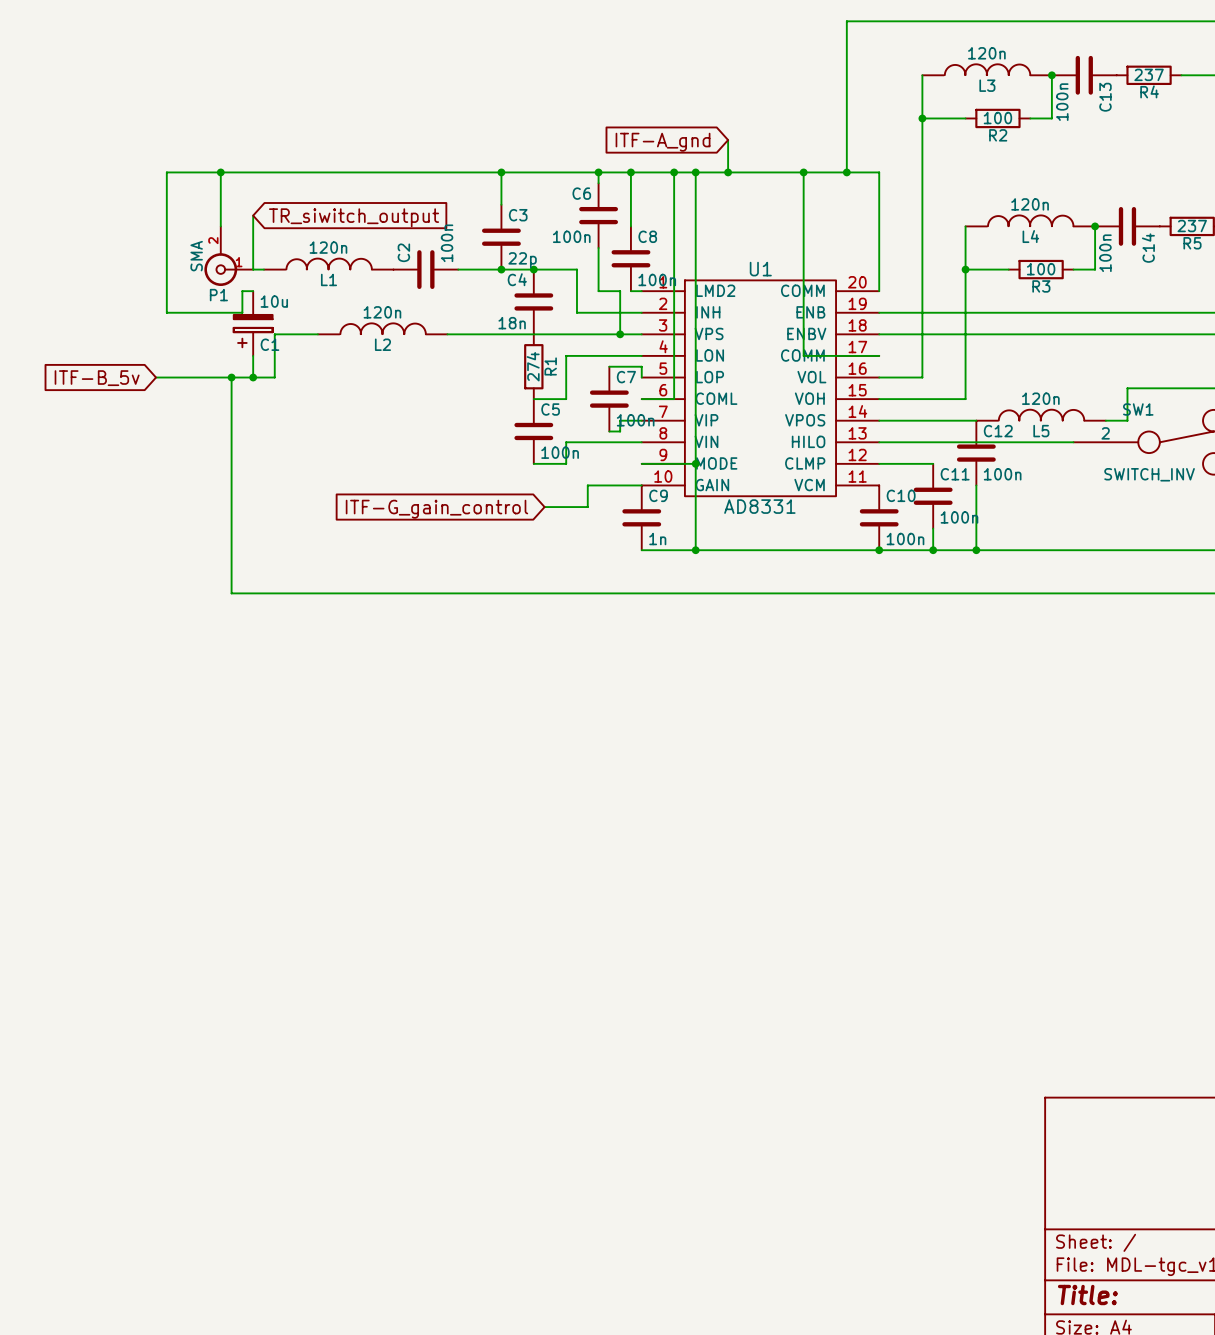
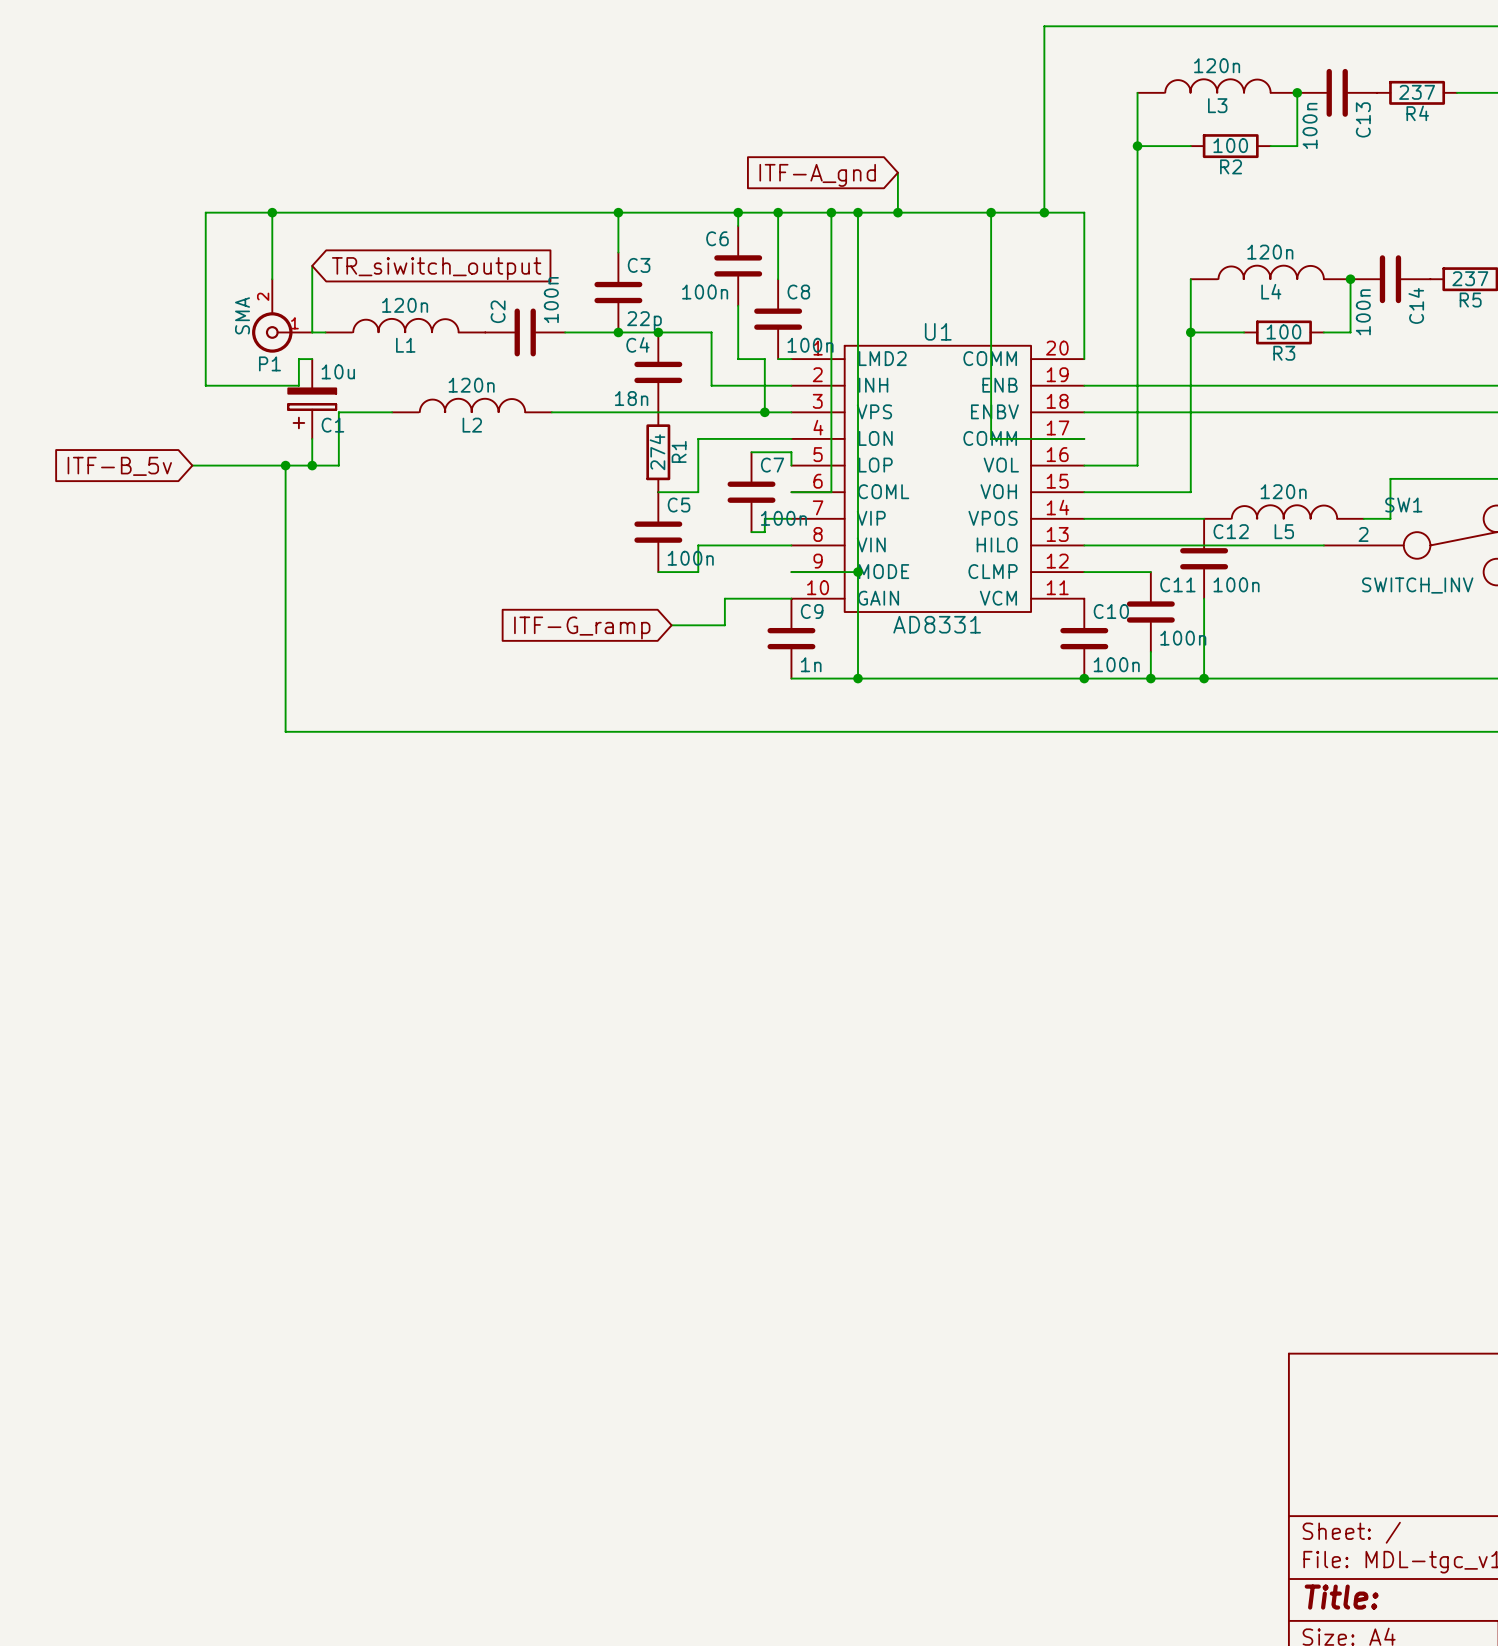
global label: ITF-G_gain_control (436, 509) -> ITF-G_ramp (582, 627)

